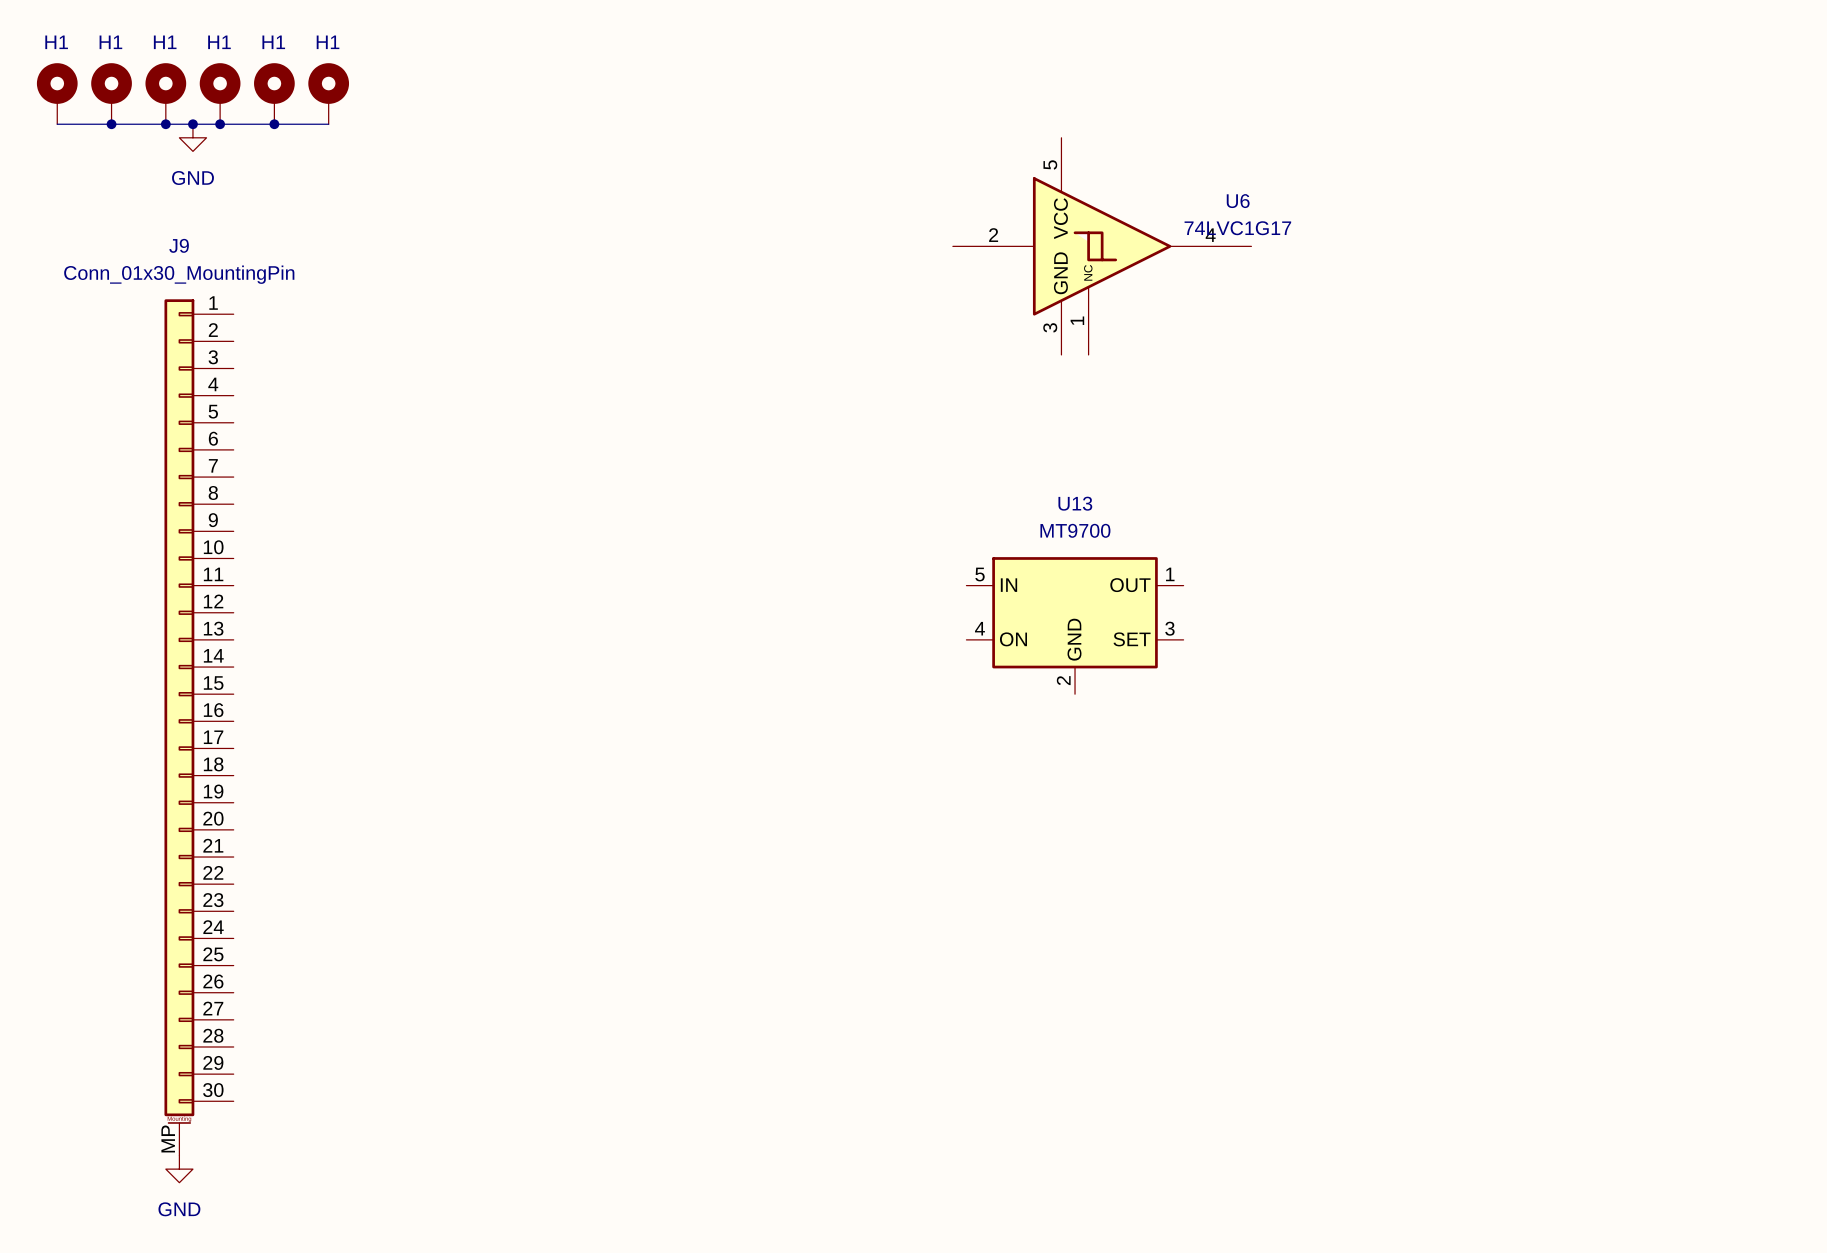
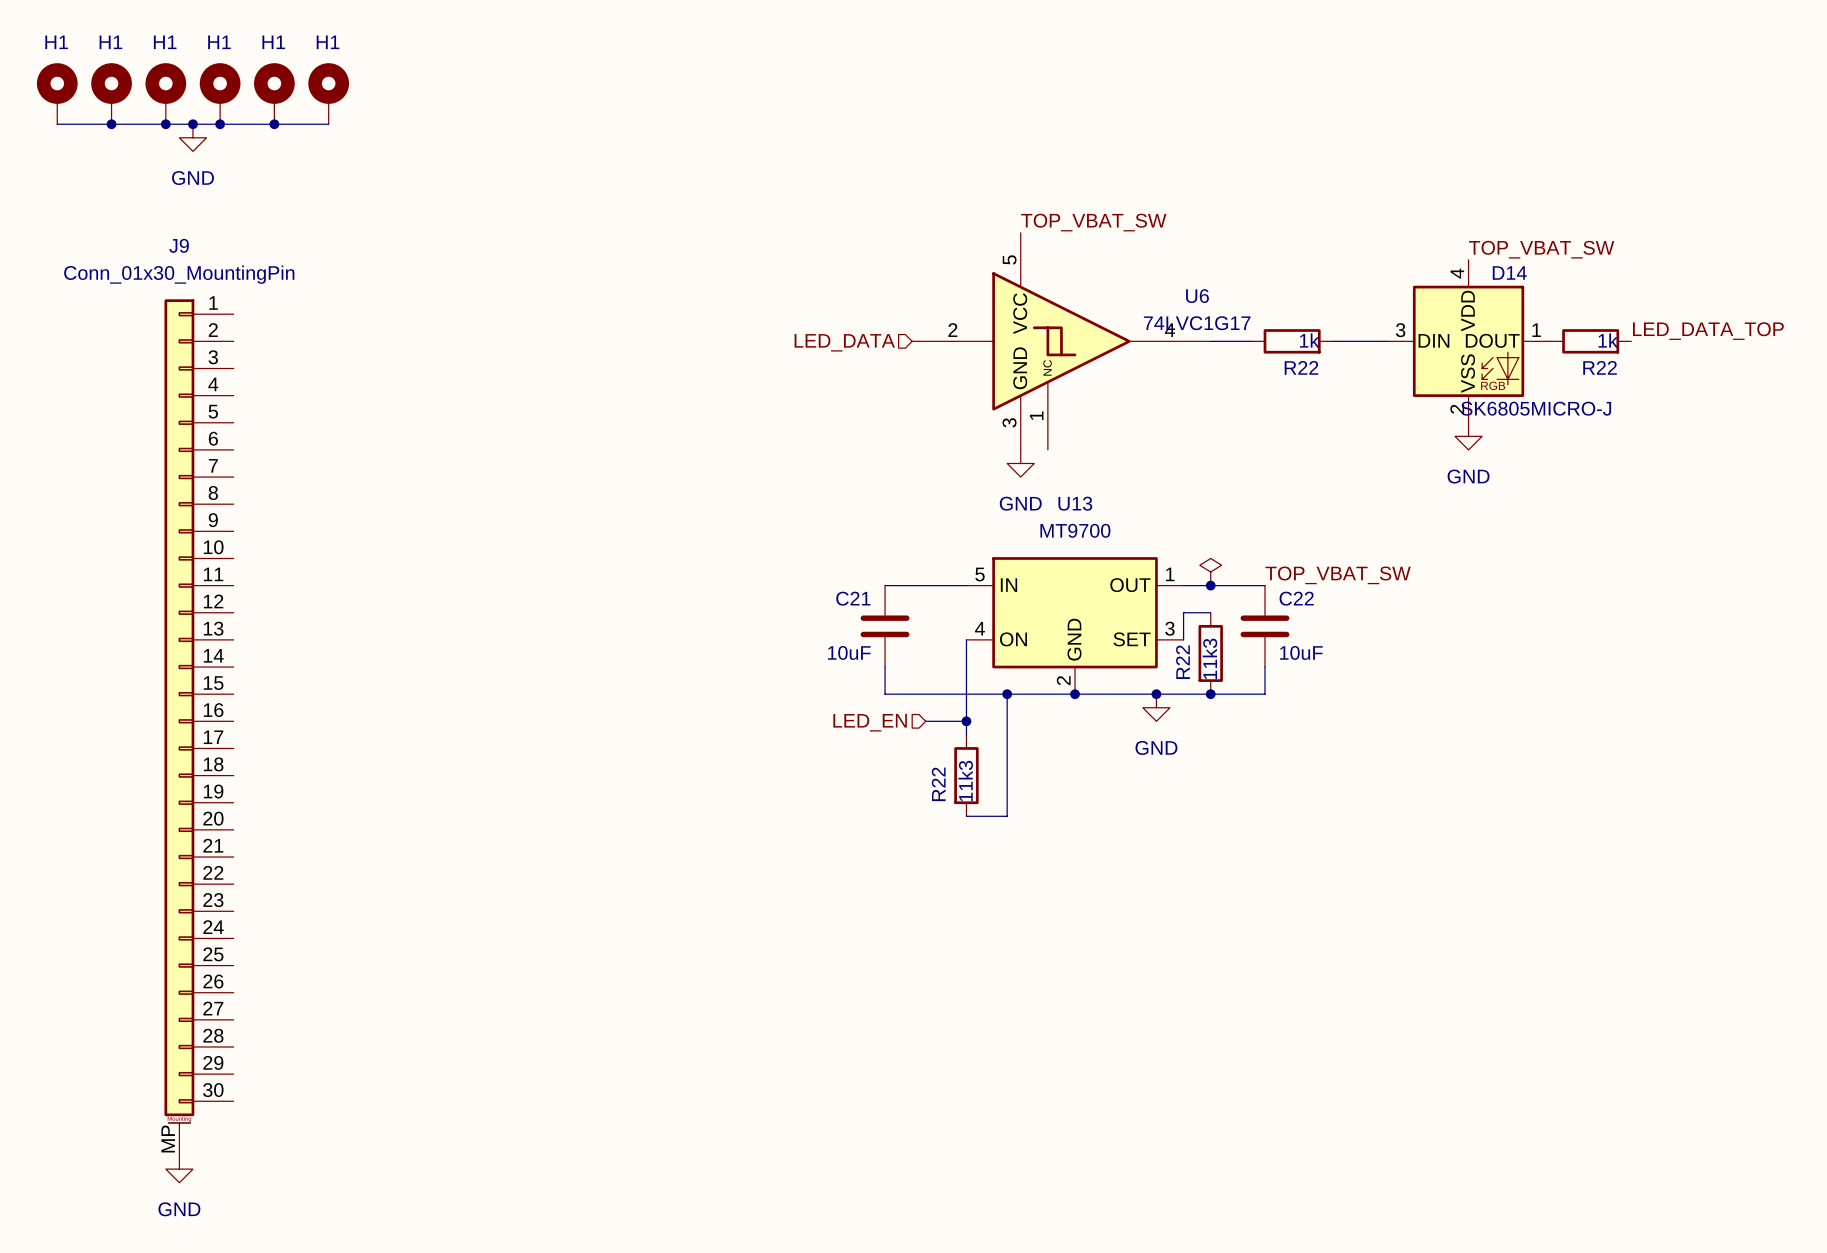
label: none -> TOP_VBAT_SW (1093, 222)
U6 position: (1102, 246) -> (1061, 341)
label: none -> TOP_VBAT_SW (1541, 249)
label: none -> LED_DATA_TOP (1708, 331)
wire: none -> (1210, 341) (1251, 341)
R22: none -> 1k (1292, 341)
wire: none -> (1332, 341) (1387, 341)
D14: none -> SK6805MICRO-J (1468, 341)
R22: none -> 1k (1590, 341)
hierarchical label: none -> LED_DATA (844, 342)
power symbol: none -> GND (1468, 436)
power symbol: none -> GND (1020, 463)
power symbol: none -> (1210, 572)
label: none -> TOP_VBAT_SW (1338, 575)
wire: none -> (885, 585) (966, 585)
wire: none -> (1183, 585) (1264, 585)
junction: none -> (1210, 585)
wire: none -> (1210, 612) (1183, 612) (1183, 639)
C21: none -> 10uF (885, 626)
C22: none -> 10uF (1264, 626)
wire: none -> (966, 639) (966, 734)
R22: none -> 11k3 (1210, 653)
wire: none -> (885, 667) (885, 694) (1264, 694) (1264, 667)
wire: none -> (1007, 694) (1007, 816) (966, 816)
junction: none -> (1007, 694)
junction: none -> (1075, 694)
junction: none -> (1156, 694)
junction: none -> (1210, 694)
power symbol: none -> GND (1156, 707)
wire: none -> (925, 721) (966, 721)
junction: none -> (966, 721)
hierarchical label: none -> LED_EN (870, 722)
R22: none -> 11k3 (966, 775)

